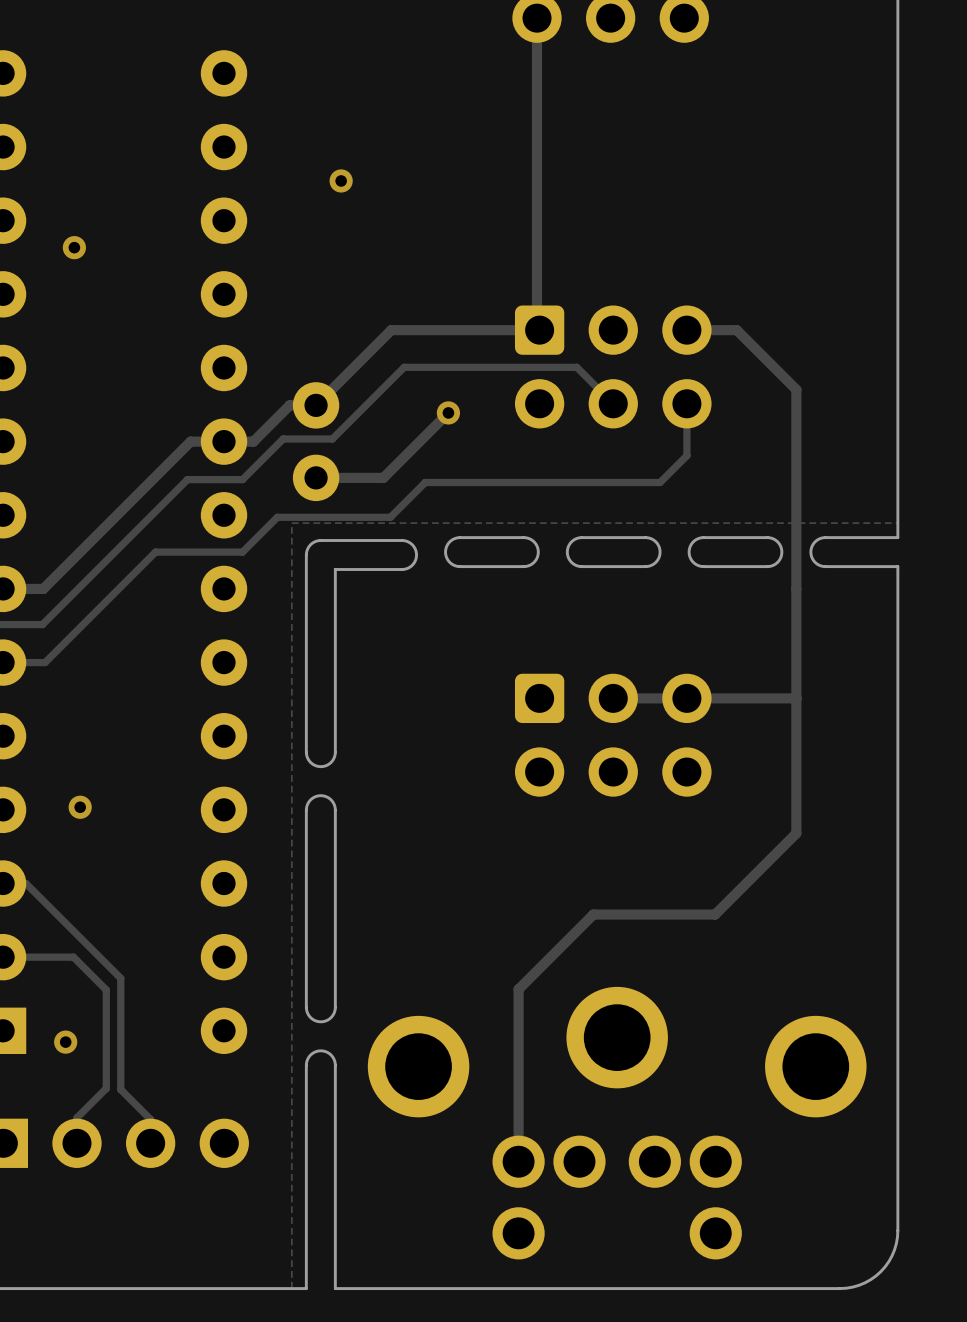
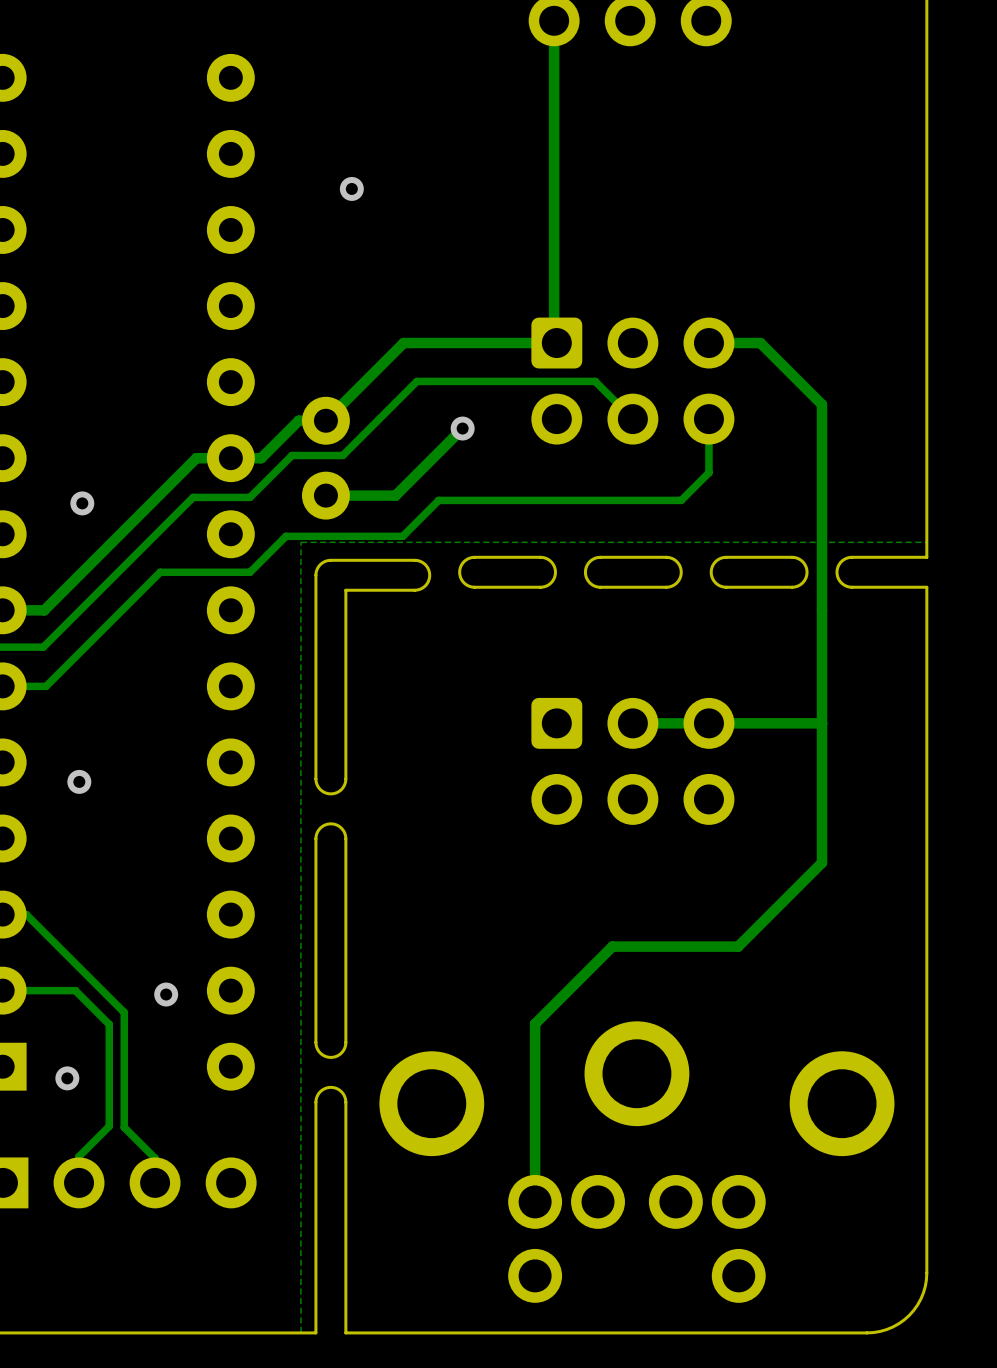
via: (74, 247) -> none
via: none -> (82, 503)
via position: (80, 807) -> (79, 781)
via: none -> (166, 994)

